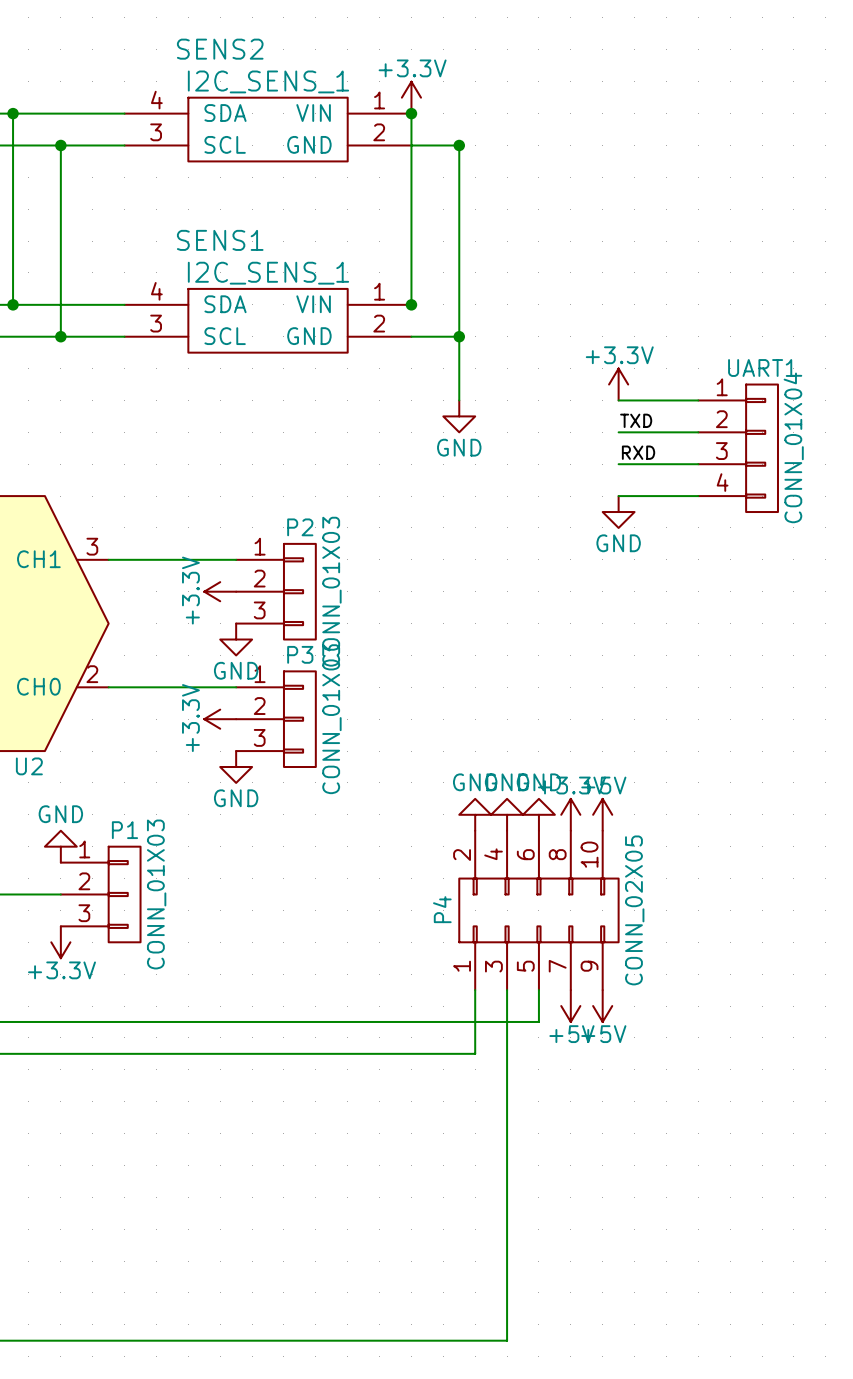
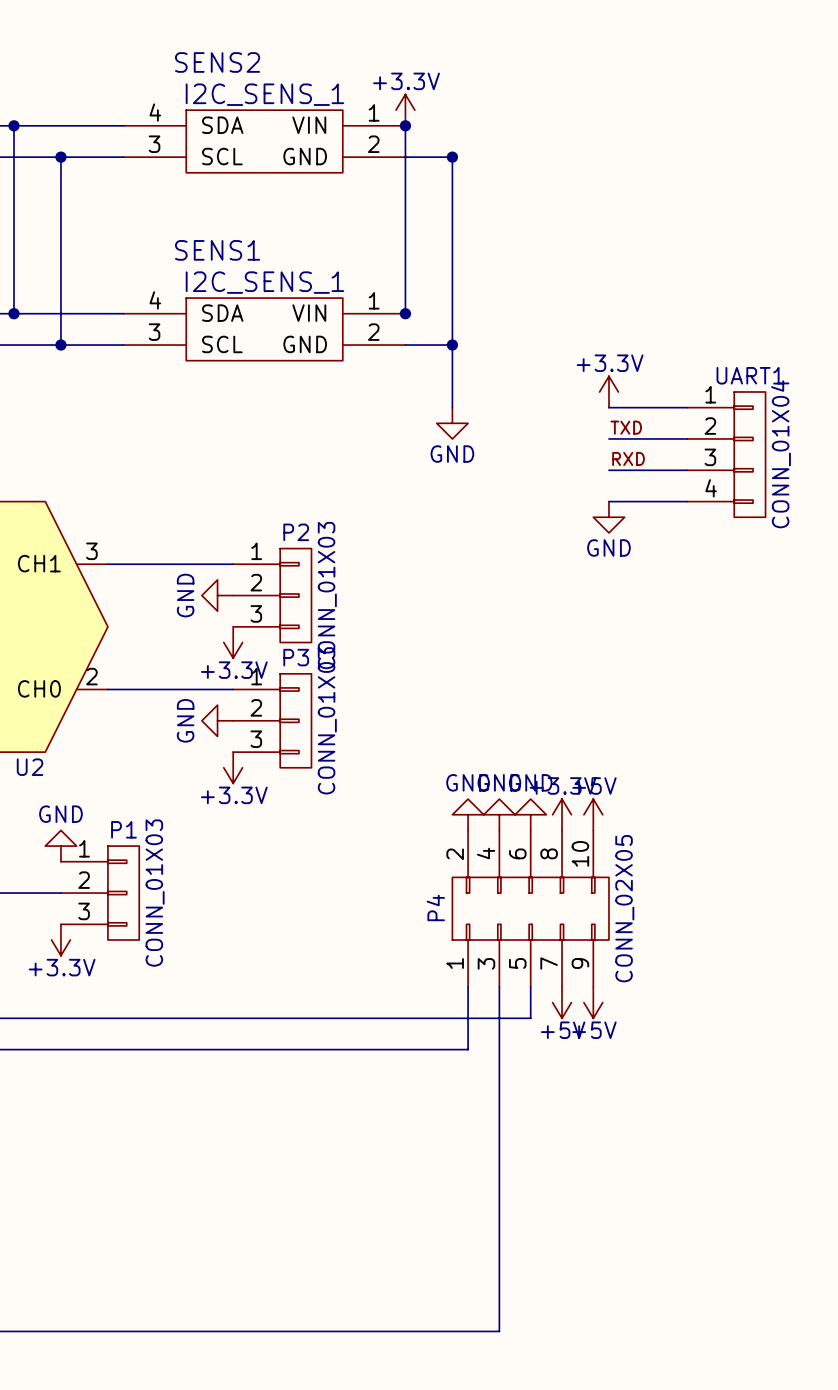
power symbol: +3.3V (220, 591) -> GND (217, 595)
power symbol: GND (236, 639) -> +3.3V (233, 642)
power symbol: +3.3V (220, 719) -> GND (217, 720)
power symbol: GND (236, 766) -> +3.3V (233, 767)

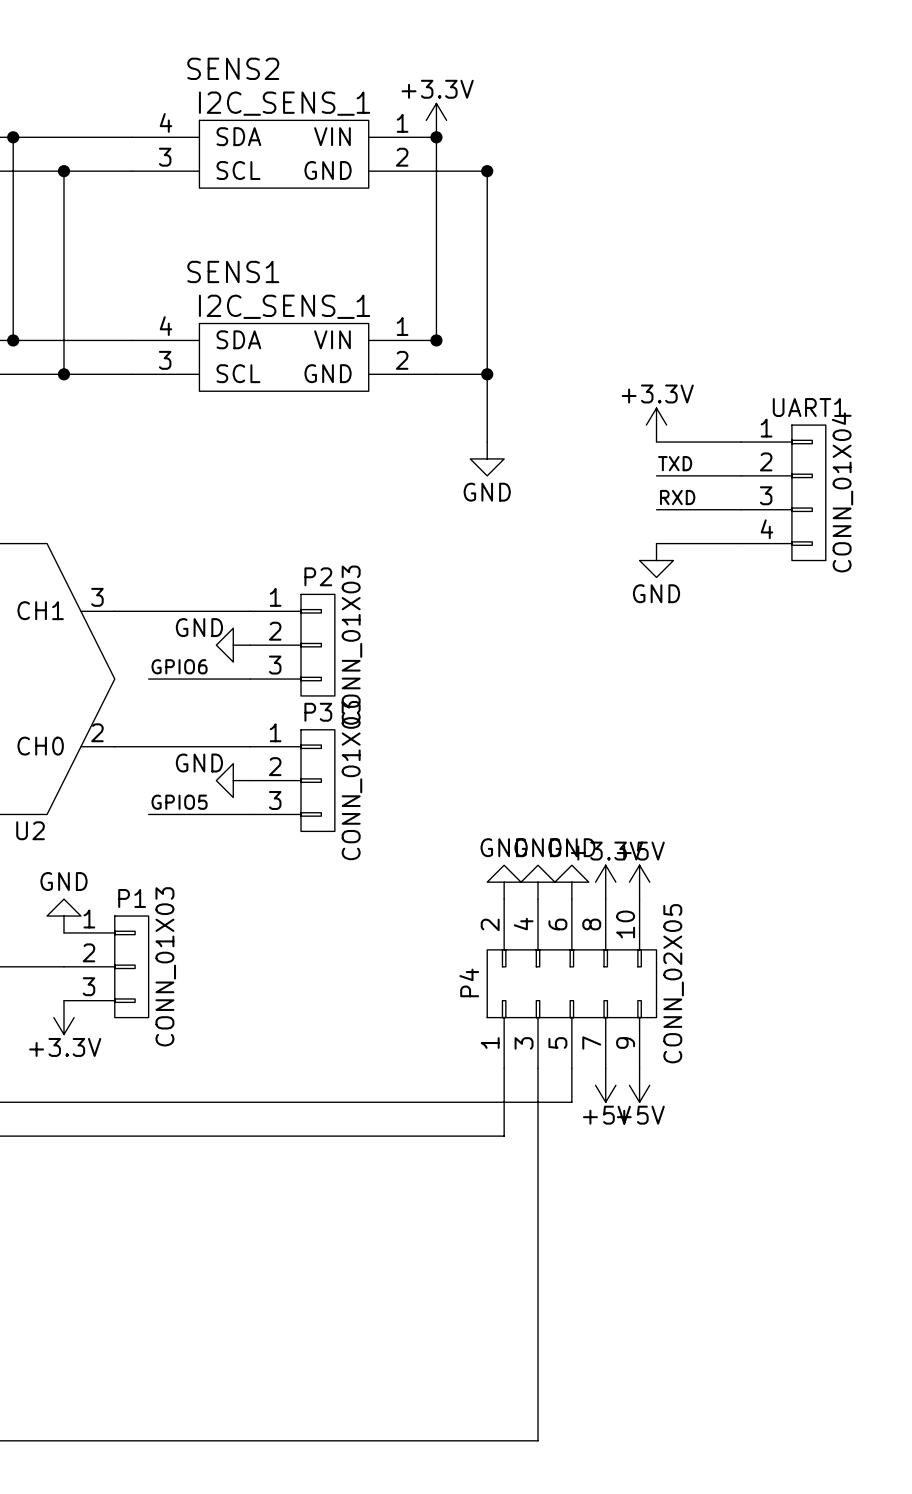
power symbol text rotation: 0° (185, 595) -> 90° clockwise (199, 627)
label: none -> GPIO6 (179, 666)
wire: none -> (148, 679) (250, 679)
power symbol: +3.3V (233, 642) -> none
power symbol text rotation: 0° (185, 720) -> 90° clockwise (199, 763)
label: none -> GPIO5 (179, 802)
wire: none -> (148, 814) (250, 814)
power symbol: +3.3V (233, 767) -> none

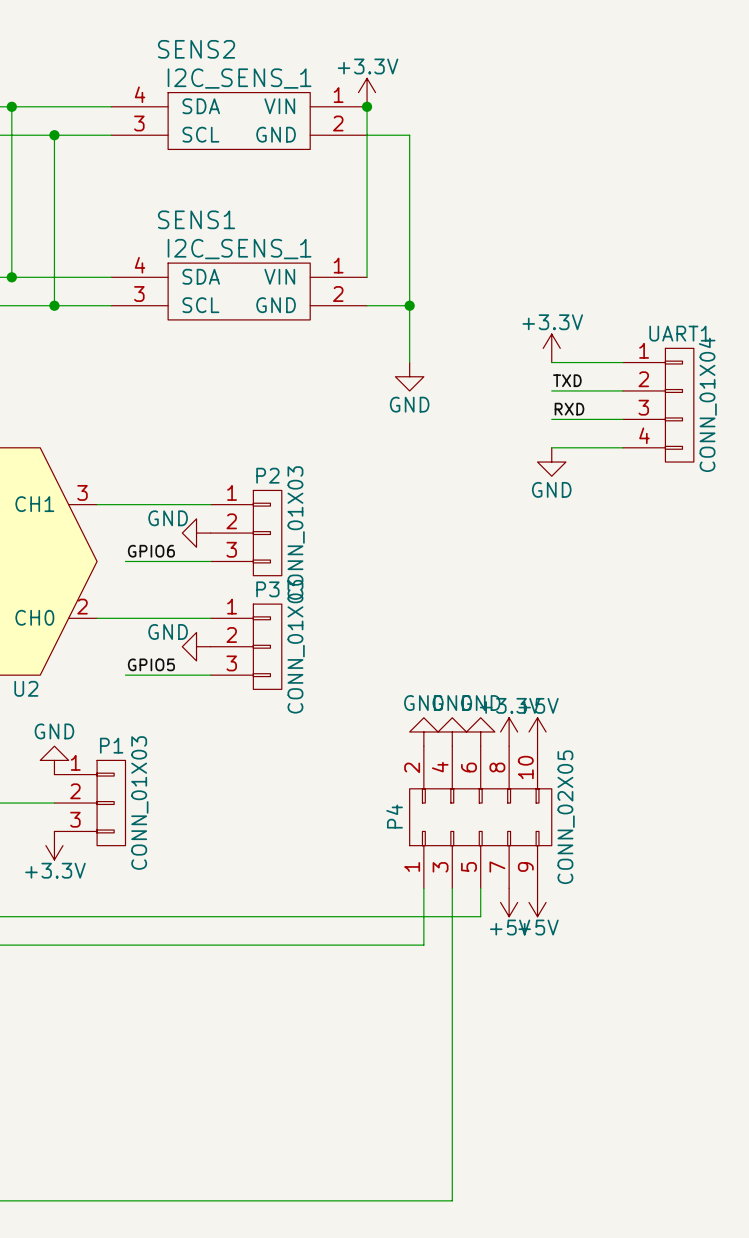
junction: (487, 171) -> none
junction: (436, 340) -> none

